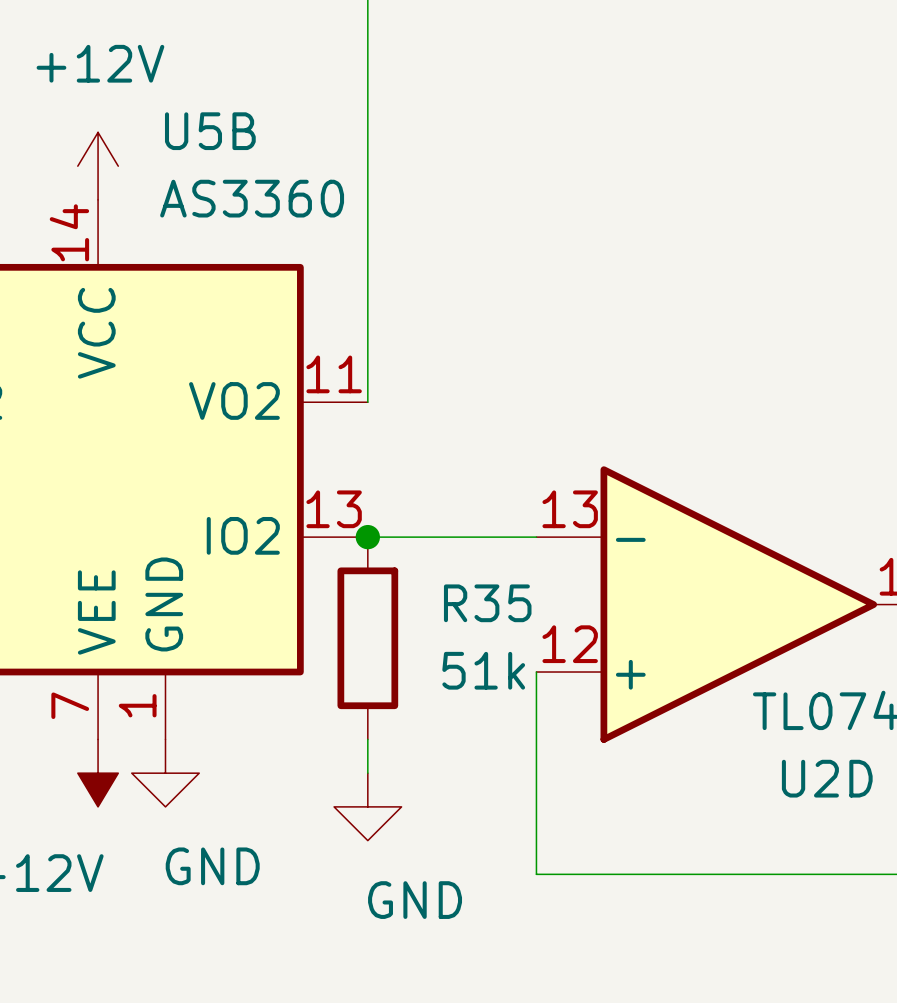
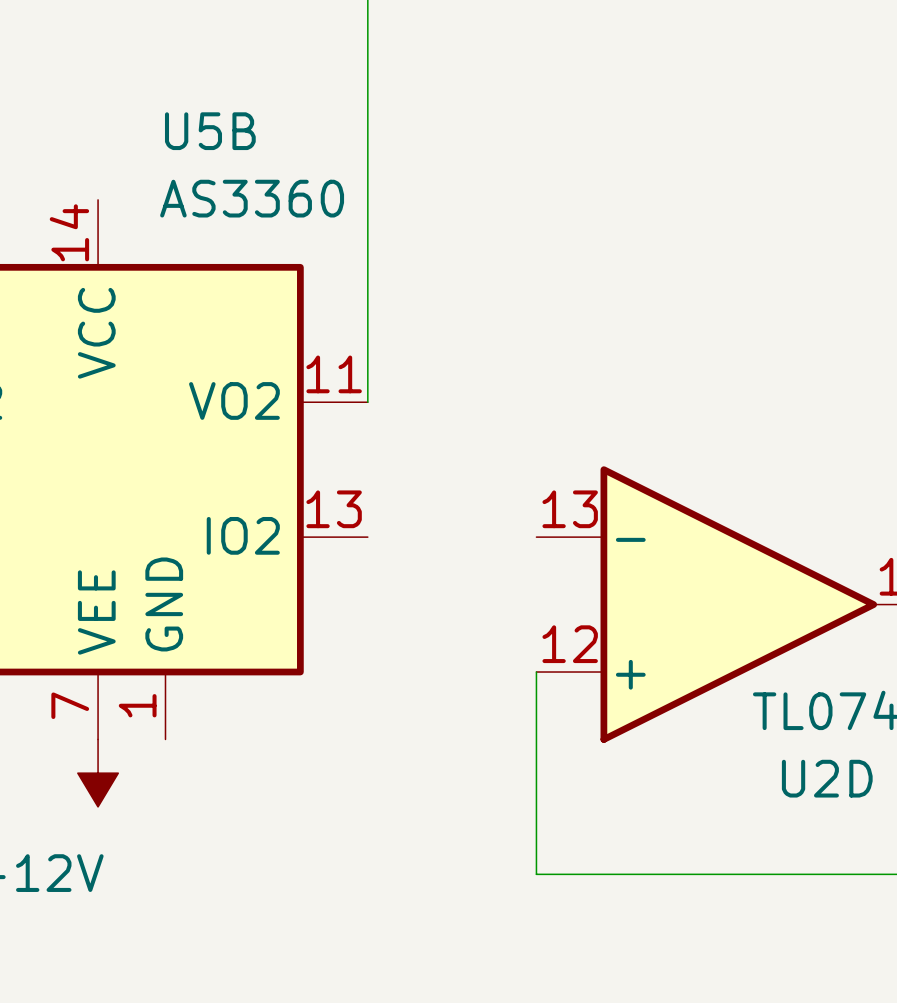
power symbol: +12V (98, 166) -> none
wire: (367, 537) (536, 537) -> none
junction: (367, 537) -> none
R35: 51k (367, 638) -> none
wire: (367, 739) (367, 773) -> none
power symbol: GND (165, 773) -> none
power symbol: GND (367, 806) -> none

